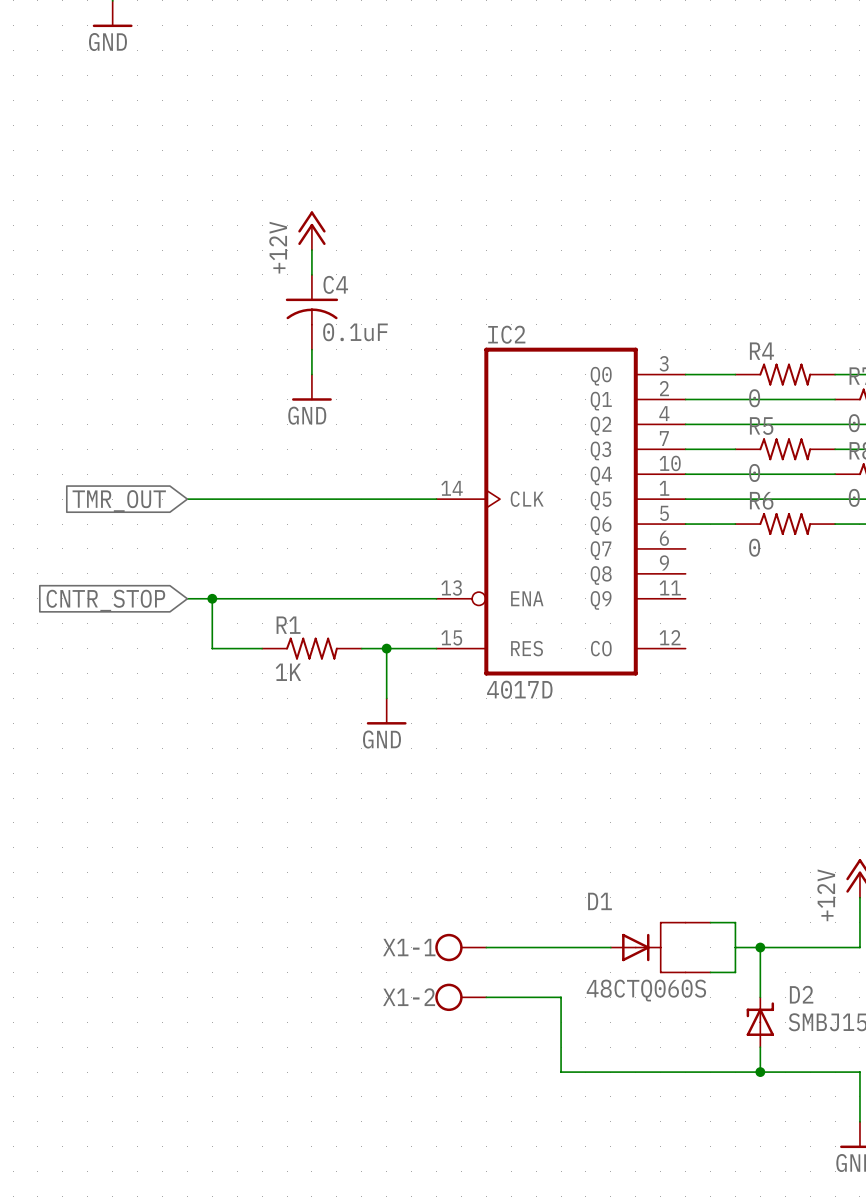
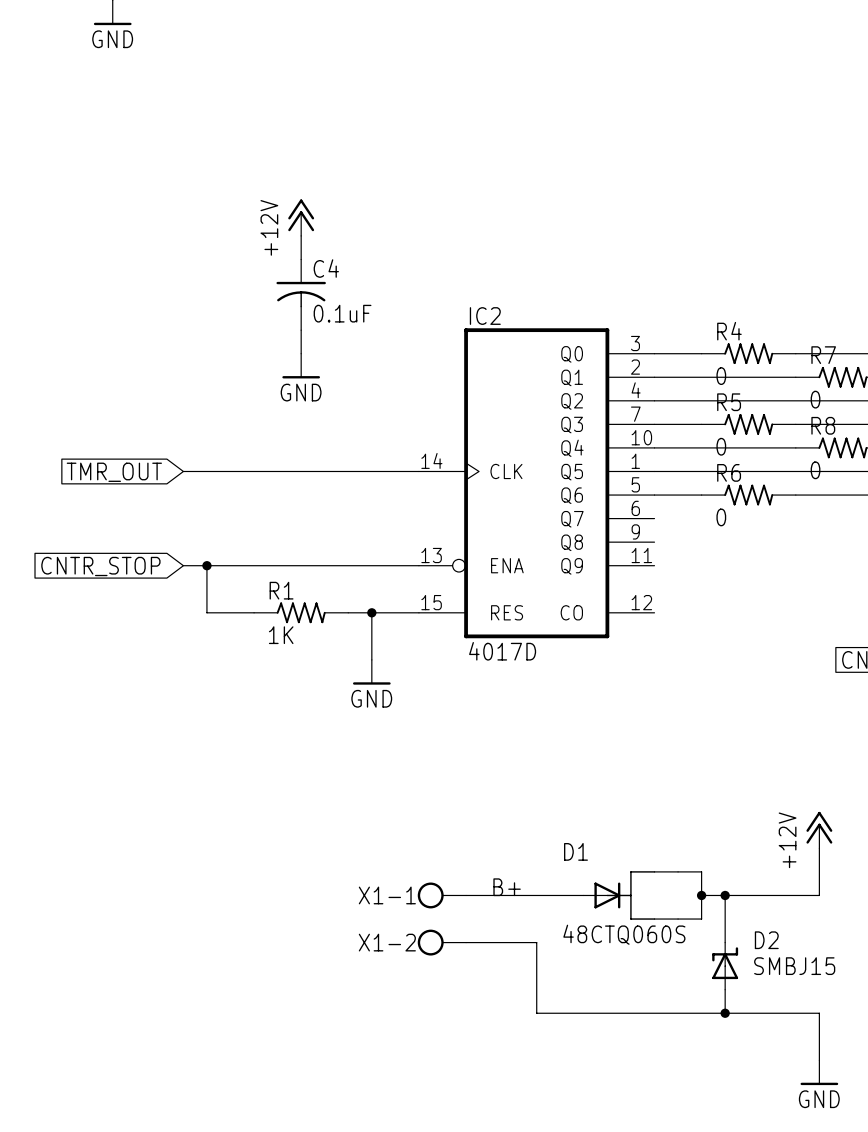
label: none -> B+ (507, 887)
junction: none -> (701, 895)

